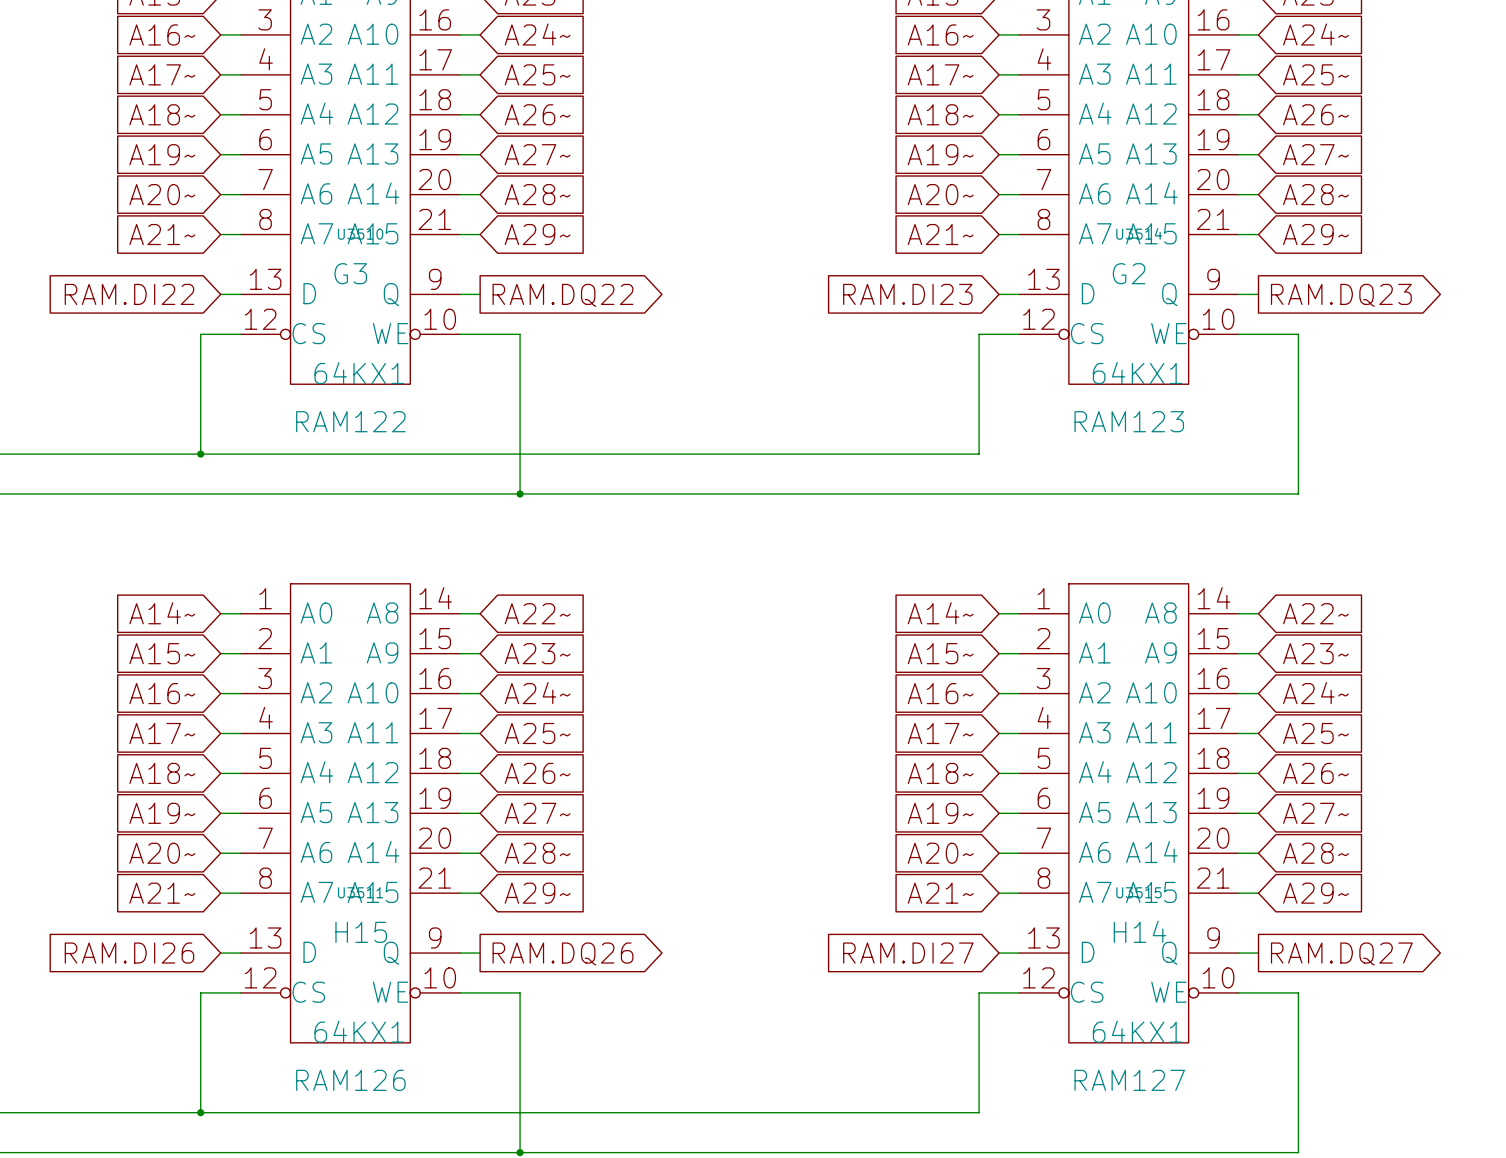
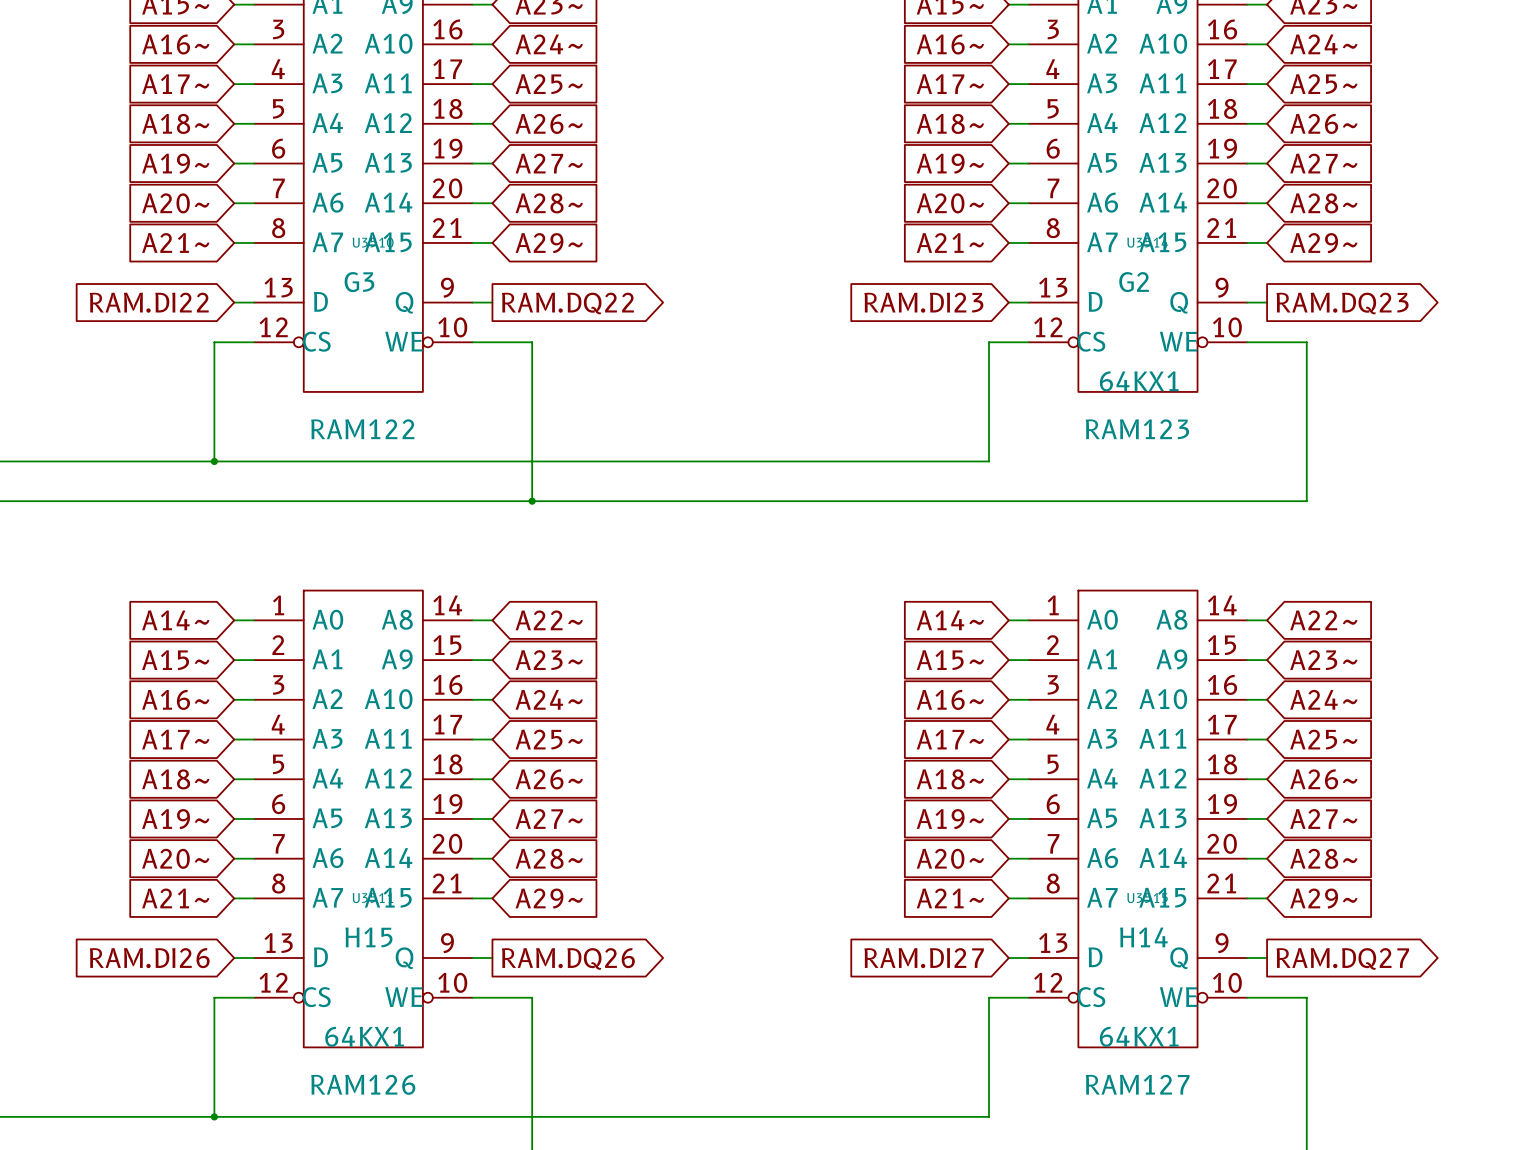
U3510 value: 64KX1 (359, 373) -> none

